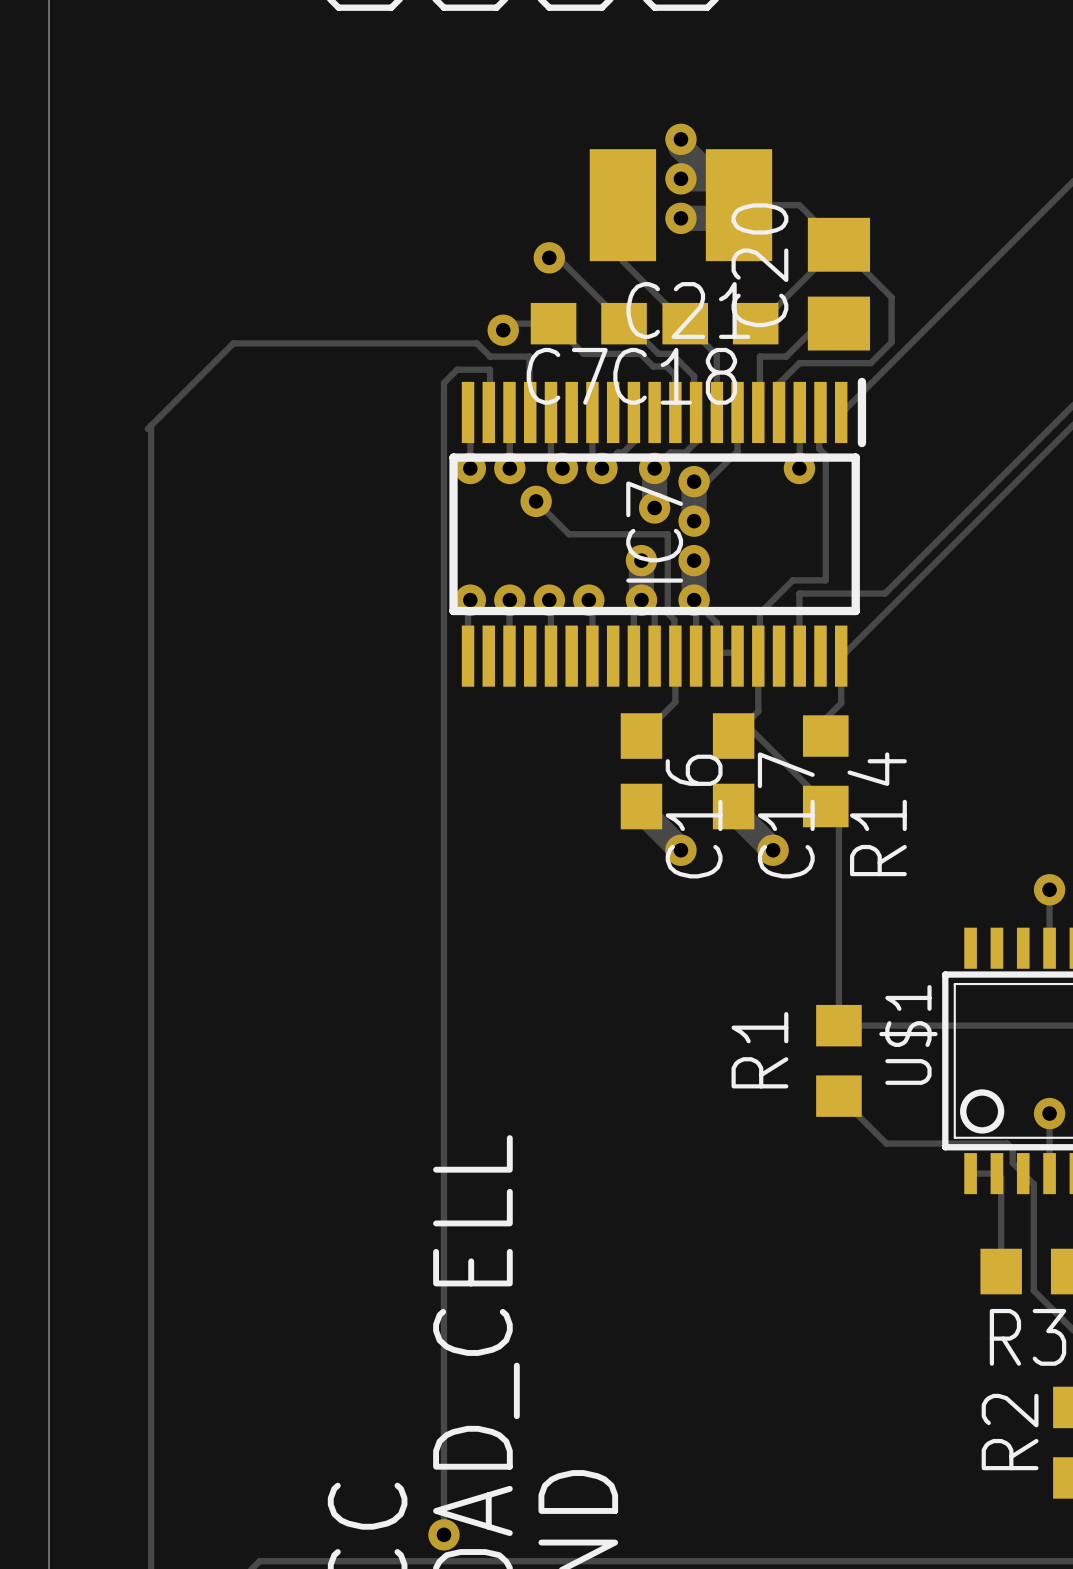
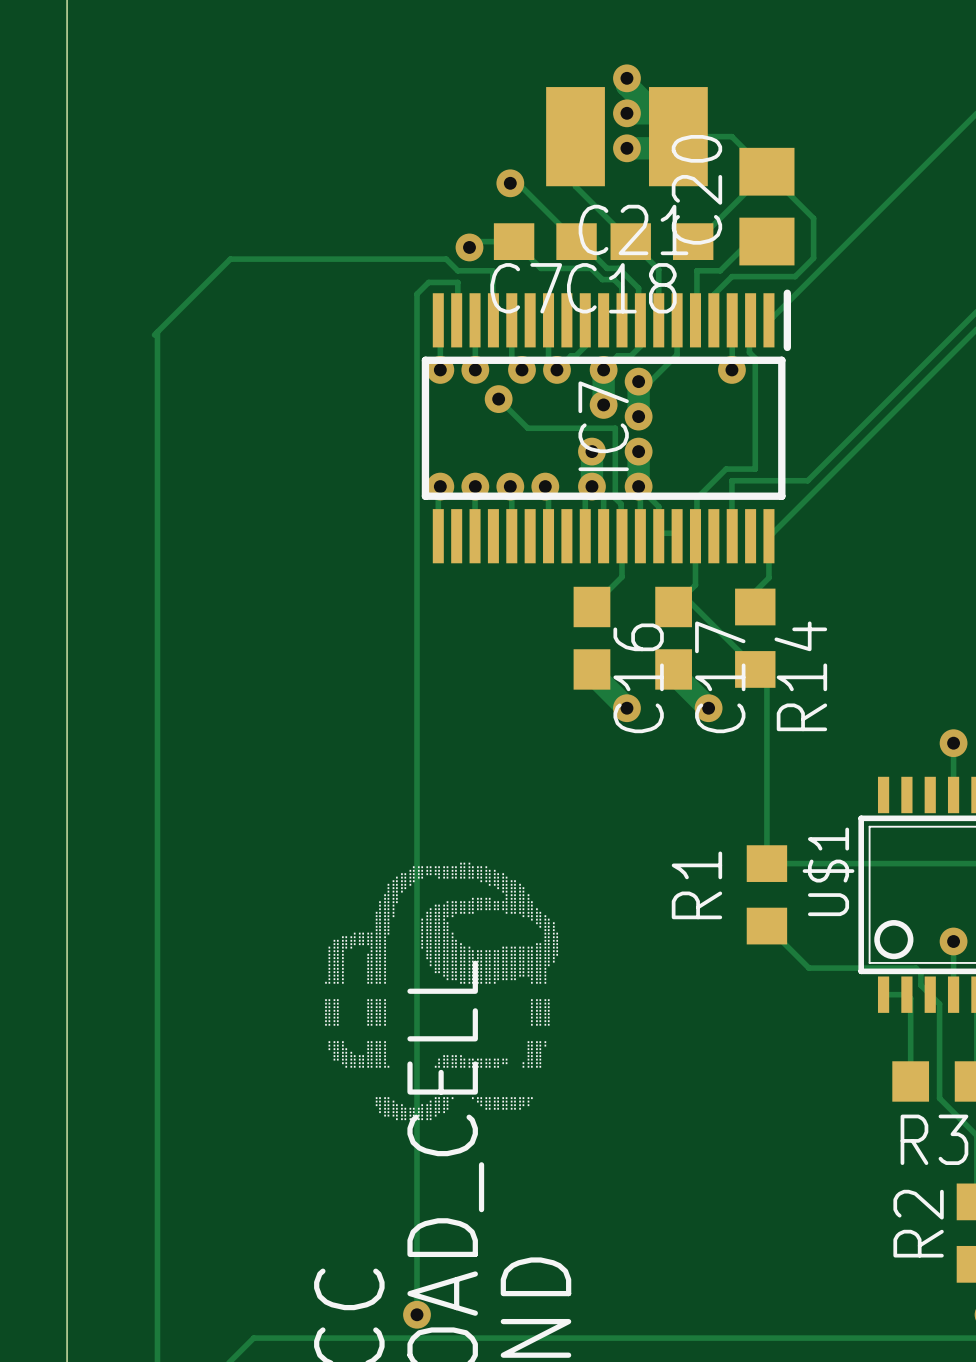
text: none -> ⠀⠀⠀⠀⠀⠀⠀⠀⠀⠀⠀⣠⣤⣤⣤⣤⣤⣶⣦⣤⣄⡀⠀⠀⠀⠀⠀⠀⠀⠀ (452, 867)
text: none -> ⠀⠀⠀⠀⠀⠀⠀⠀⢀⣴⣿⡿⠛⠉⠙⠛⠛⠛⠛⠻⢿⣿⣷⣤⡀⠀⠀⠀⠀⠀ (454, 879)
text: none -> ⠀⠀⠀⠀⠀⠀⠀⠀⣼⣿⠋⠀⠀⠀⠀⠀⠀⠀⢀⣀⣀⠈⢻⣿⣿⡄⠀⠀⠀⠀ (456, 893)
text: none -> ⠀⠀⠀⠀⠀⠀⠀⣸⣿⡏⠀⠀⠀⣠⣶⣾⣿⣿⣿⠿⠿⠿⢿⣿⣿⣿⣄⠀⠀⠀ (458, 907)
text: none -> ⠀⠀⠀⠀⠀⠀⠀⣿⣿⠁⠀⠀⢰⣿⣿⣯⠁⠀⠀⠀⠀⠀⠀⠀⠈⠙⢿⣷⡄⠀ (465, 921)
text: none -> ⠀⠀⣀⣤⣴⣶⣶⣿⡟⠀⠀⠀⢸⣿⣿⣿⣆⠀⠀⠀⠀⠀⠀⠀⠀⠀⠀⣿⣷⠀ (445, 935)
text: none -> ⠀⢰⣿⡟⠋⠉⣹⣿⡇⠀⠀⠀⠘⣿⣿⣿⣿⣷⣦⣤⣤⣤⣶⣶⣶⣶⣿⣿⣿⠀ (443, 949)
text: none -> ⠀⢸⣿⡇⠀⠀⣿⣿⡇⠀⠀⠀⠀⠹⣿⣿⣿⣿⣿⣿⣿⣿⣿⣿⣿⣿⣿⡿⠃⠀ (441, 963)
text: none -> ⠀⣸⣿⡇⠀⠀⣿⣿⡇⠀⠀⠀⠀⠀⠉⠻⠿⣿⣿⣿⣿⡿⠿⠿⠛⢻⣿⡇⠀⠀ (435, 977)
text: none -> ⠀⣿⣿⠀⠀⠀⣿⣿⡇⠀⠀⠀⠀⠀⠀⠀⠀⠀⠀⠀⠀⠀⠀⠀⠀⢸⣿⣿⠀⠀ (437, 1005)
text: none -> ⠀⣿⣿⠀⠀⠀⣿⣿⡇⠀⠀⠀⠀⠀⠀⠀⠀⠀⠀⠀⠀⠀⠀⠀⠀⢸⣿⣿⠀⠀ (437, 1019)
text: none -> ⠀⠸⣿⣧⡀⠀⣿⣿⡇⠀⠀⠀⠀⠀⠀⠀⠀⠀⠀⠀⠀⠀⠀⠀⠀⣿⣿⠃⠀⠀ (437, 1047)
text: none -> ⠀⠀⠛⢿⣿⣿⣿⣿⣇⠀⠀⠀⠀⠀⣰⣿⣿⣷⣶⣶⣶⣶⠶⠀⢠⣿⣿⠀⠀⠀ (437, 1061)
text: none -> ⠀⠀⠀⠀⠀⠀⠀⢿⣿⣦⣄⣀⣠⣴⣿⣿⠁⠀⠈⠻⣿⣿⣿⣿⡿⠏⠀⠀⠀⠀ (454, 1103)
text: none -> ⠀⠀⠀⠀⠀⠀⠀⠈⠛⠻⠿⠿⠿⠿⠋⠁⠀⠀⠀⠀⠀⠀⠀⠀⠀⠀⠀⠀⠀⠀ (412, 1115)

